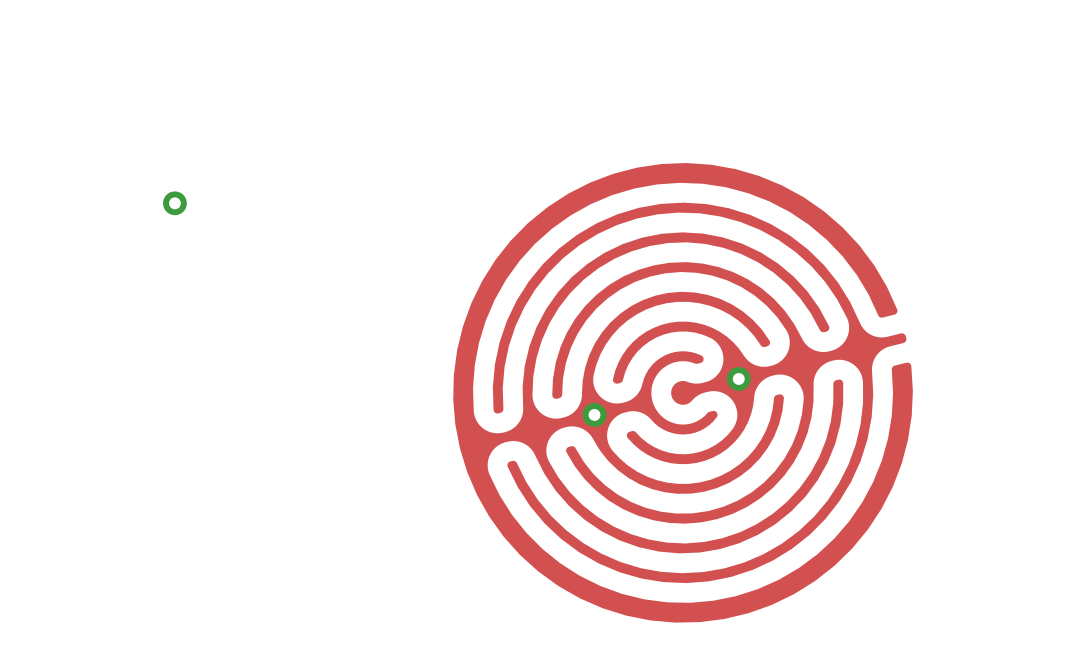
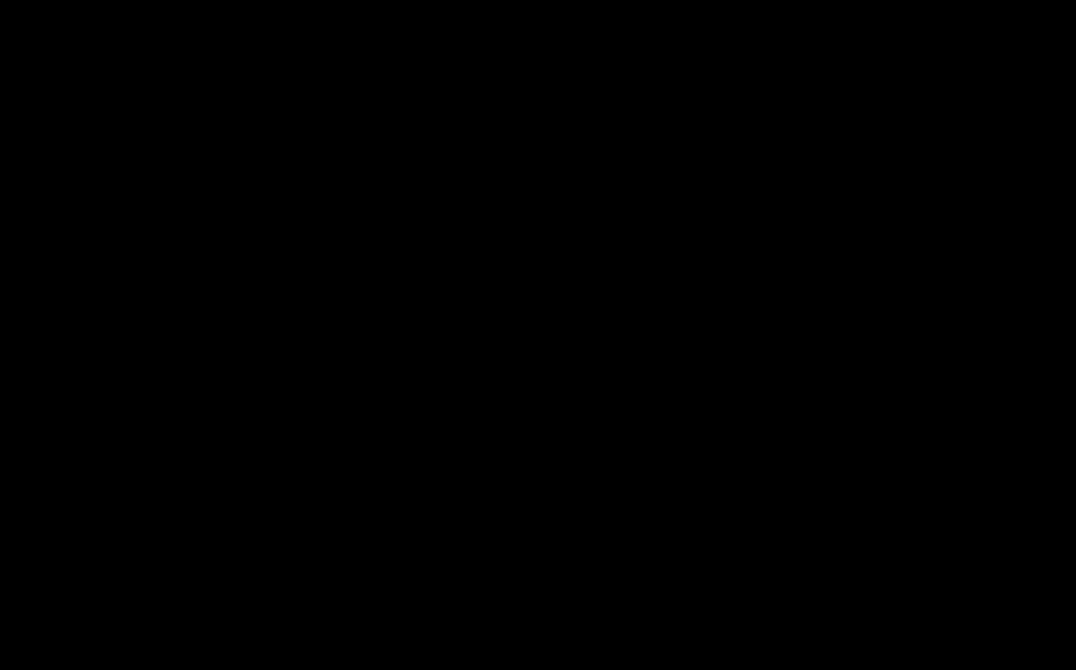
via: (174, 203) -> none
part: (683, 392) -> none

